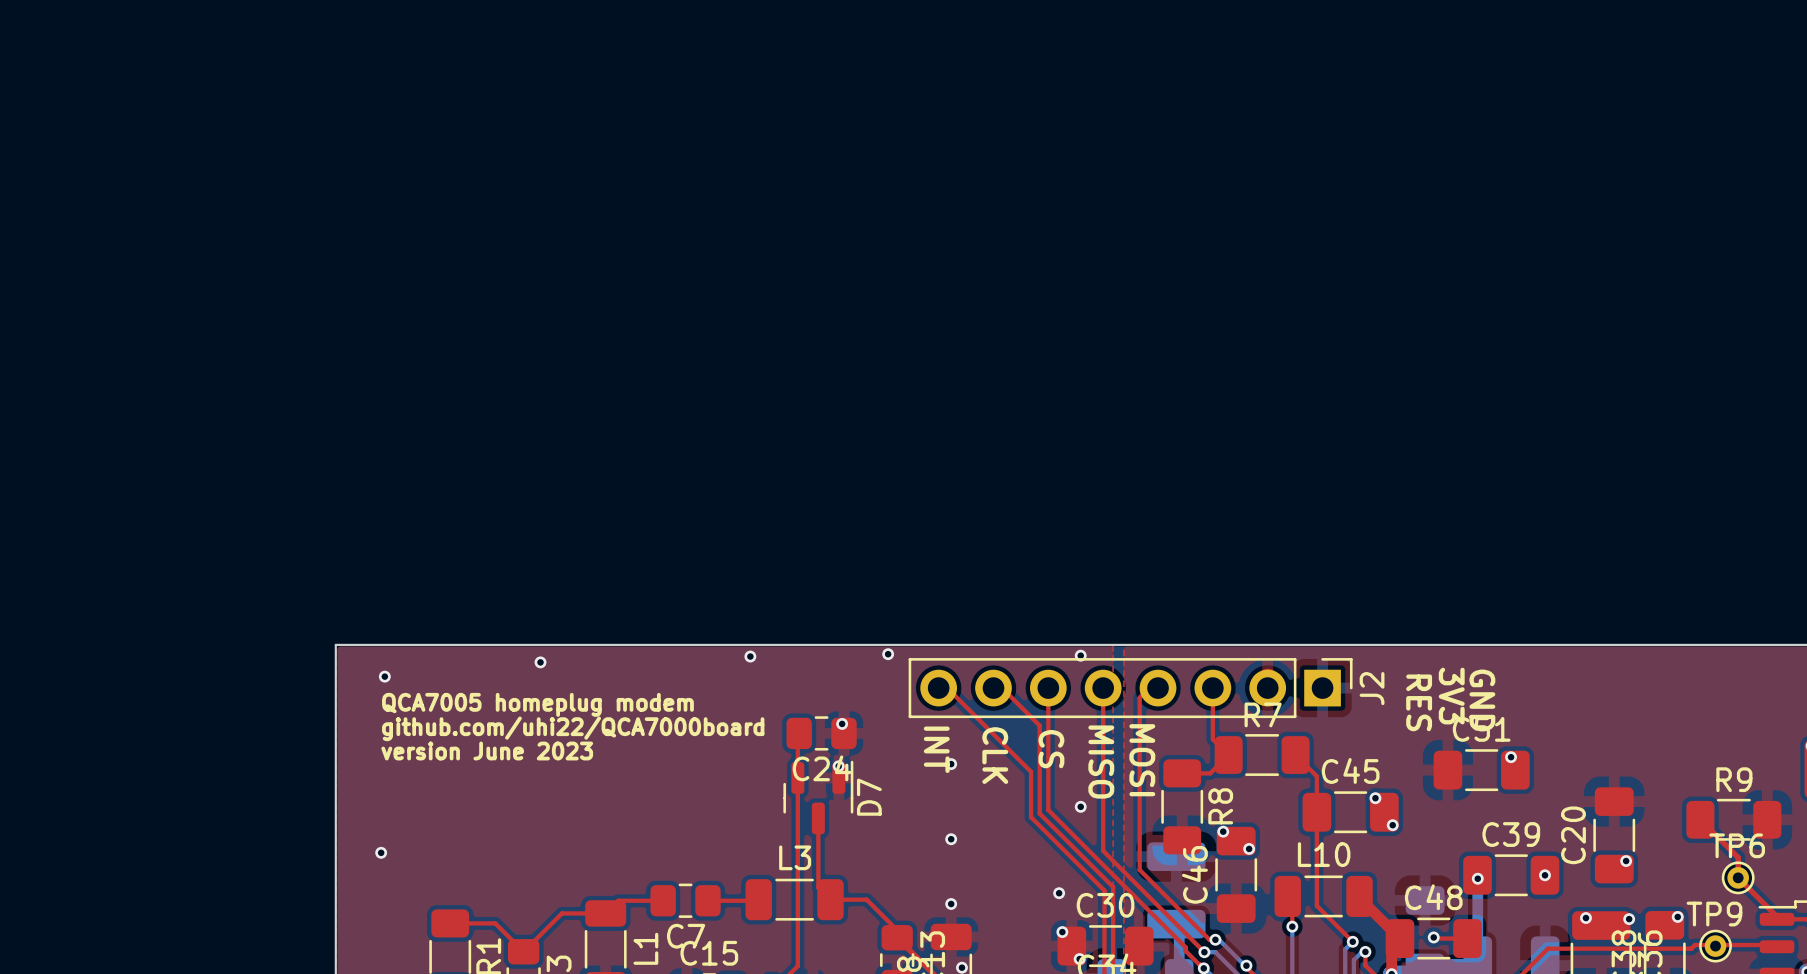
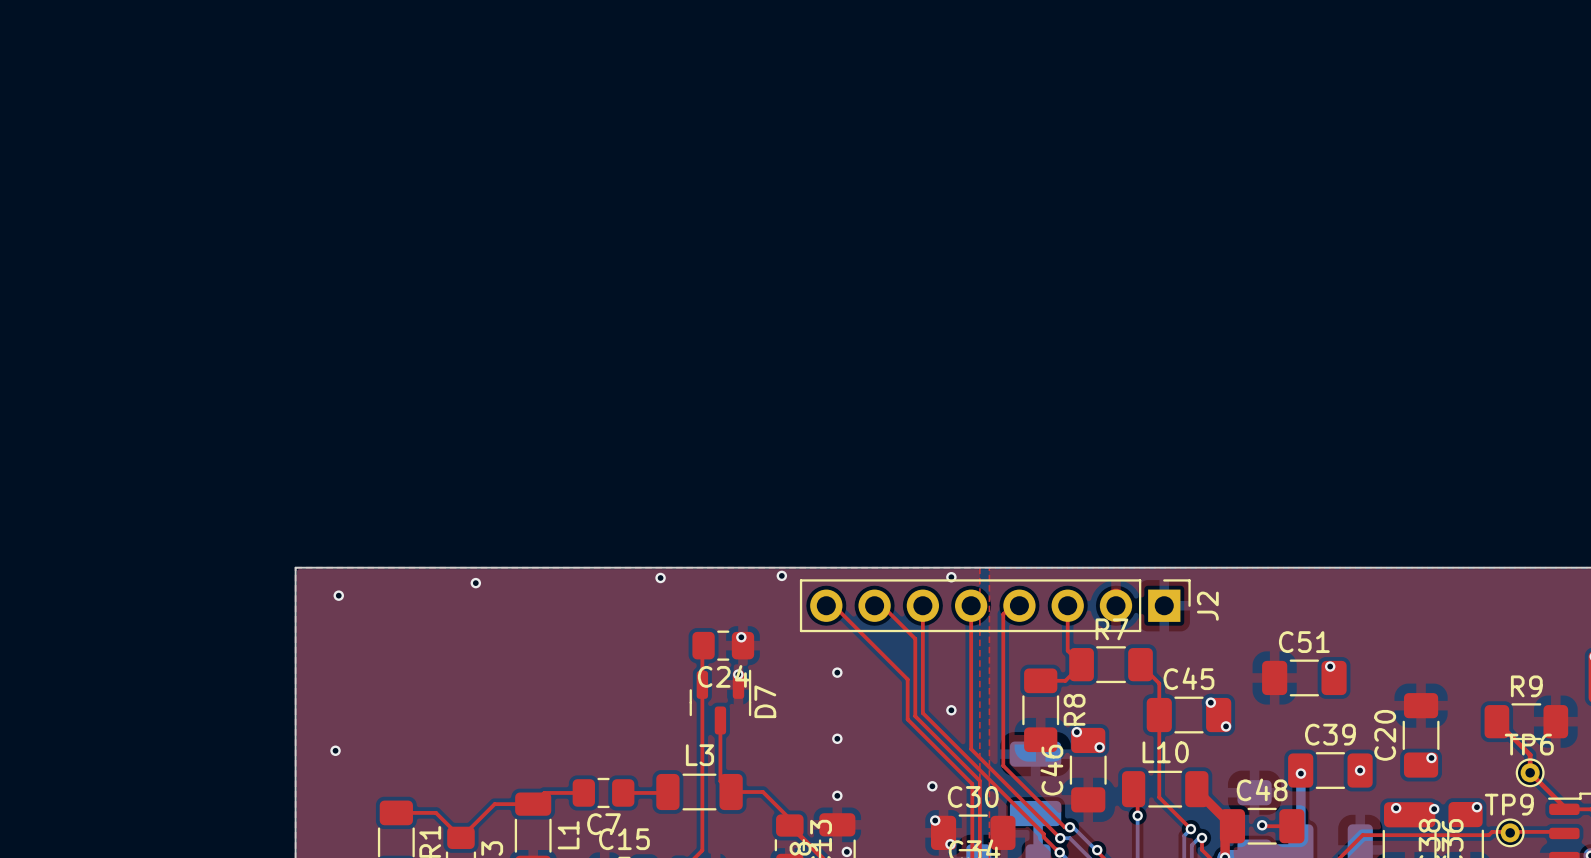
text: 3V3 (1451, 696) -> none
text: GND (1482, 700) -> none
text: RES (1419, 702) -> none
text: QCA7005 homeplug modem (537, 704) -> none
text: github.com/uhi22/QCA7000board (573, 728) -> none
text: INT (936, 749) -> none
text: CS (1051, 749) -> none
text: version June 2023 (487, 751) -> none
text: CLK (995, 755) -> none
text: MOSI (1142, 760) -> none
text: MISO (1101, 762) -> none

